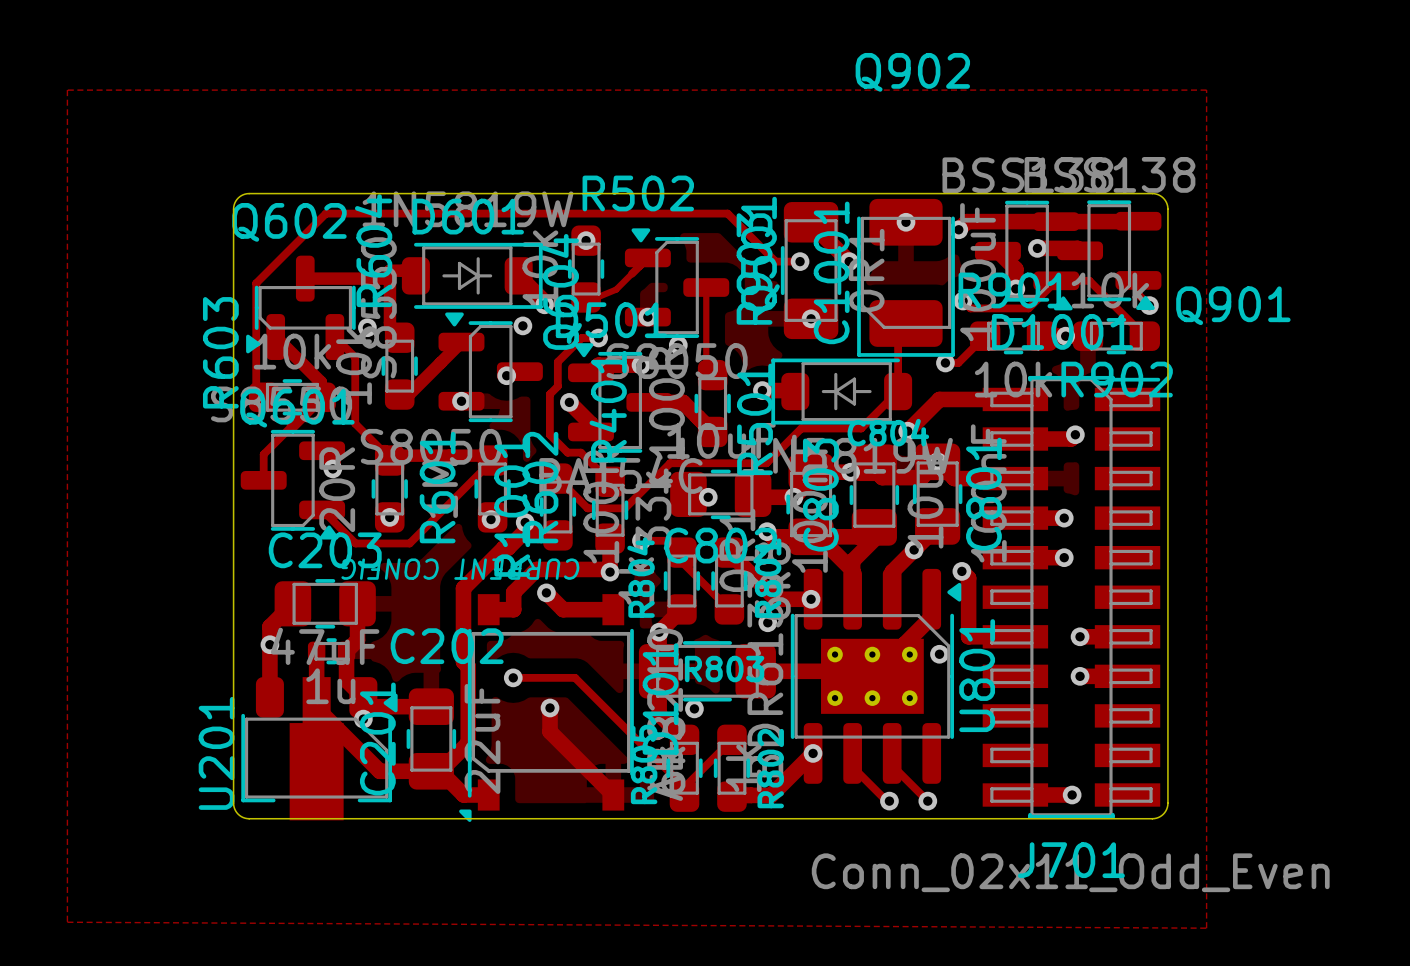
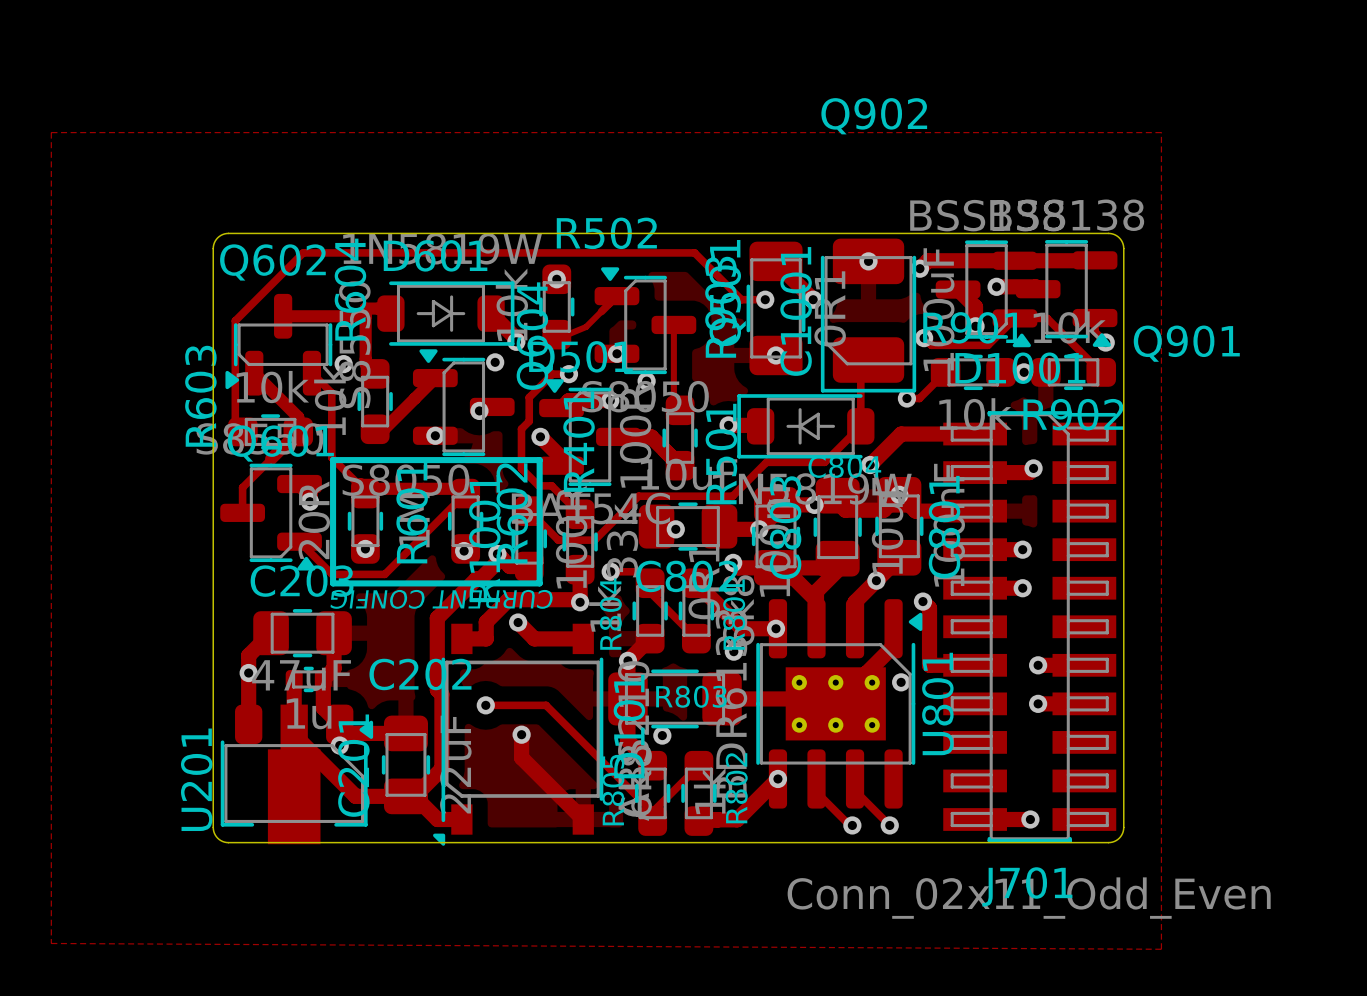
line: none -> (333, 460) (333, 583) (539, 583) (539, 460) (333, 460)

